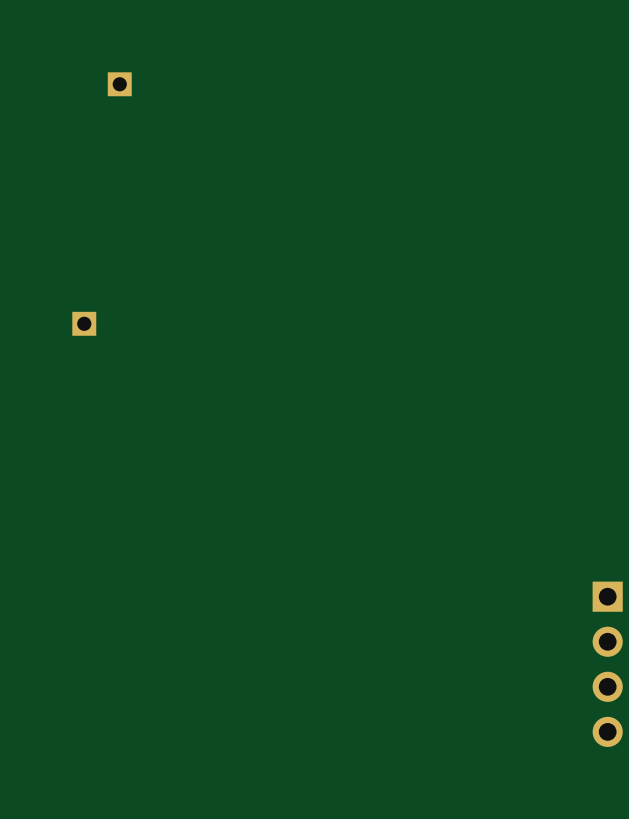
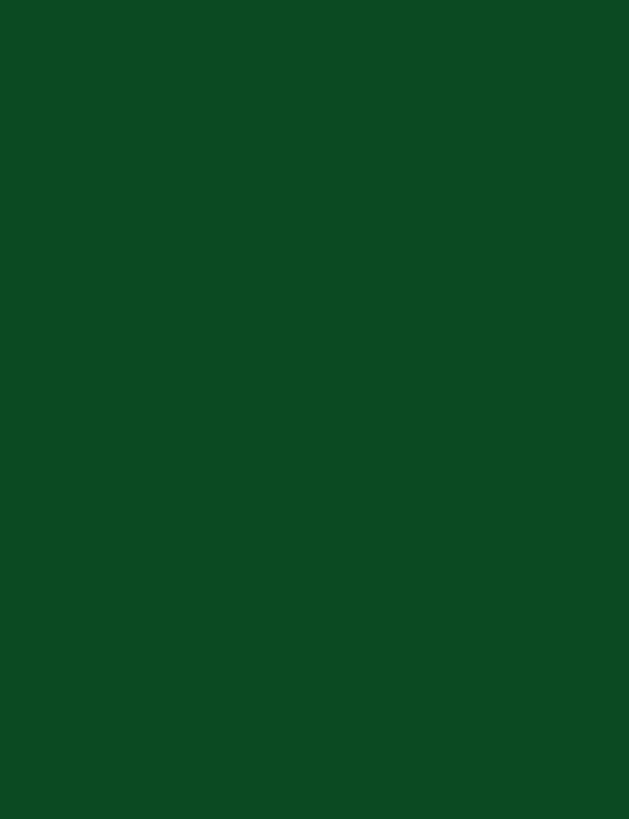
part: (119, 84) -> none
part: (84, 323) -> none
part: (607, 664) -> none

